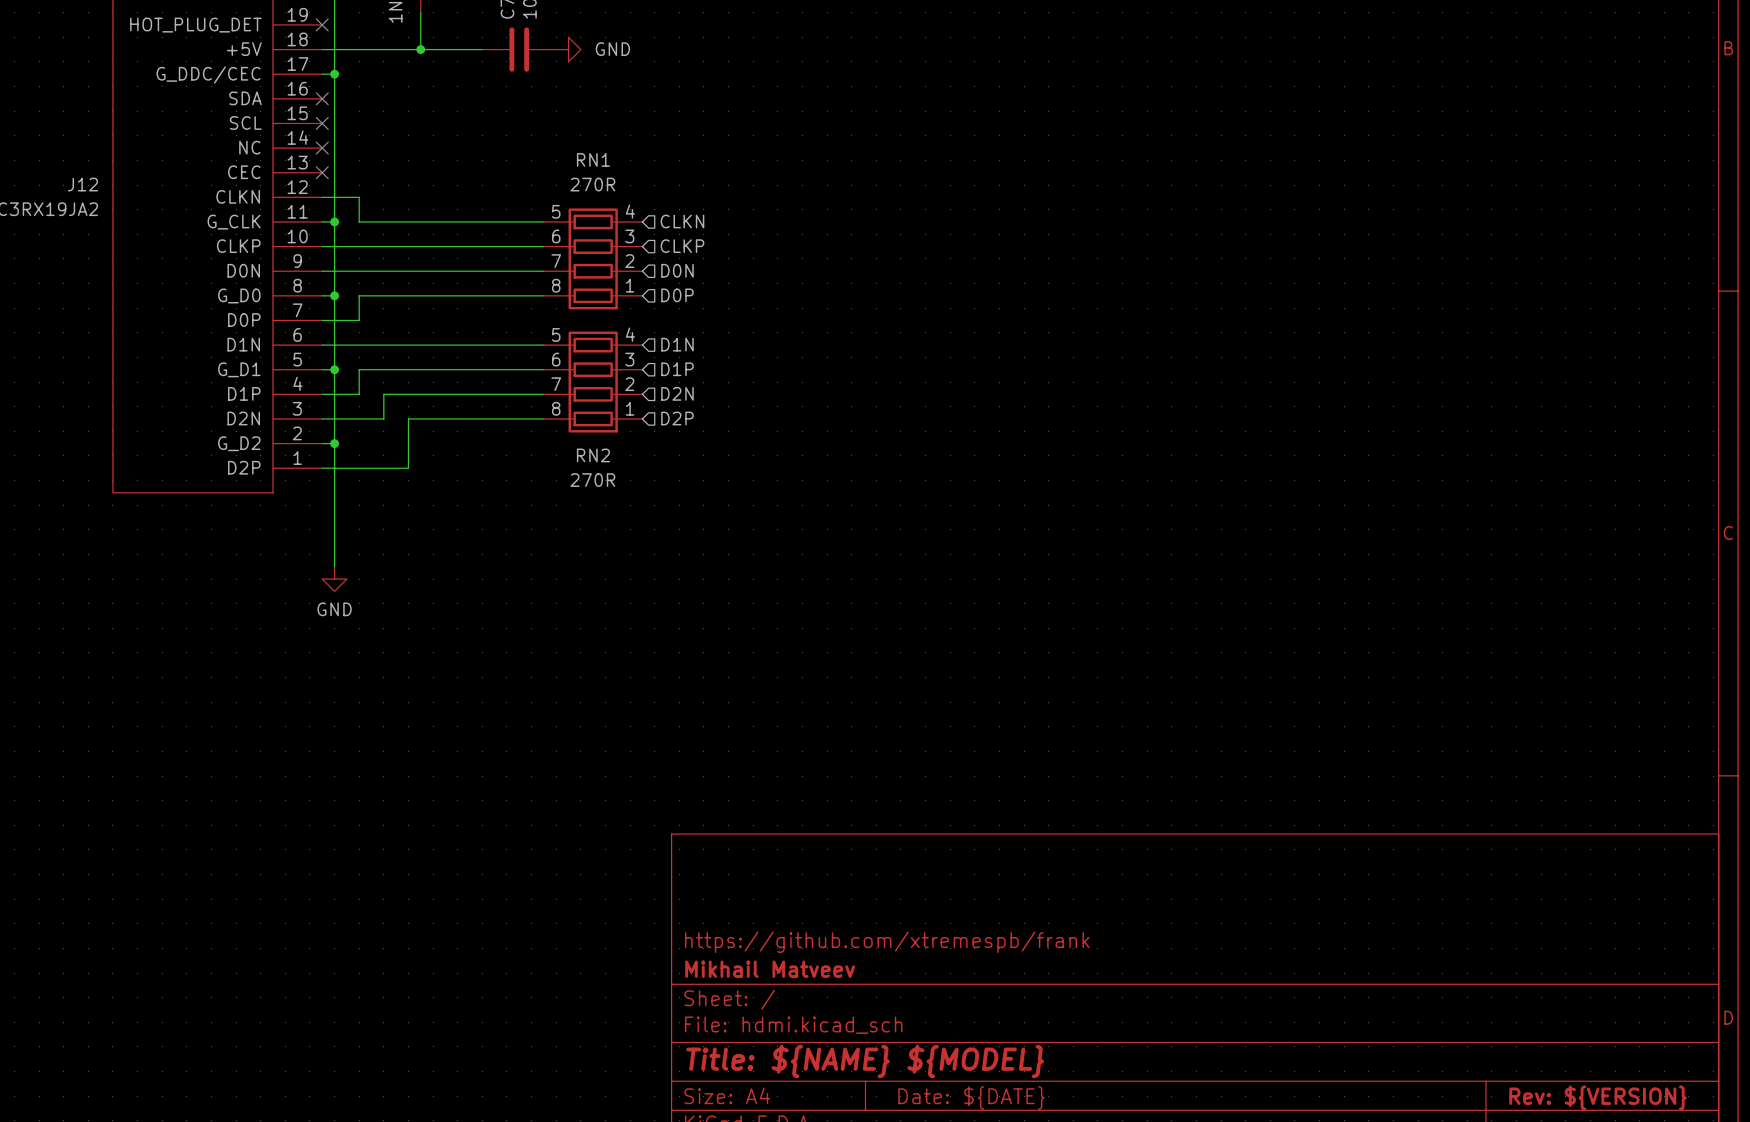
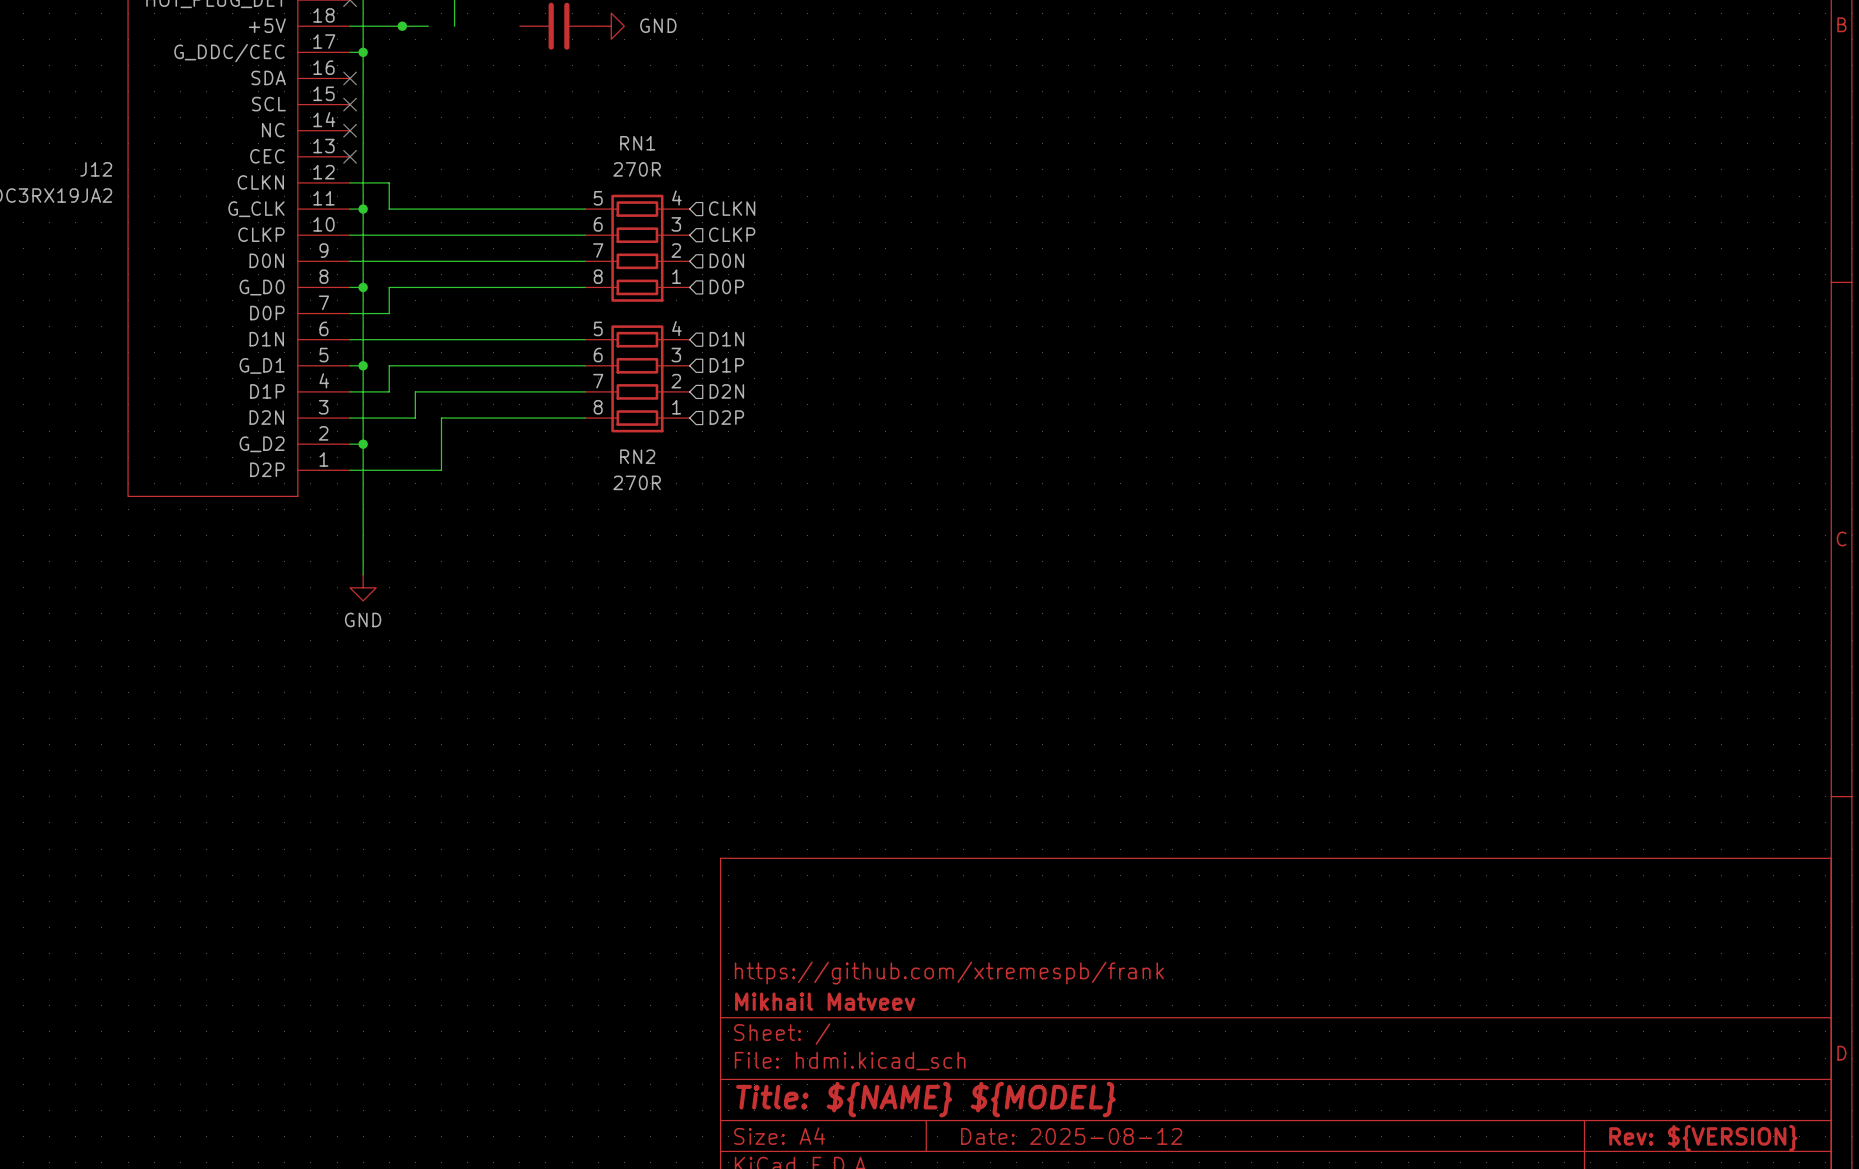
wire: (396, 49) (482, 49) -> none
junction position: (420, 49) -> (402, 26)
title block: Date: ${DATE} (971, 1097) -> Date: 2025-08-12 (1071, 1136)

